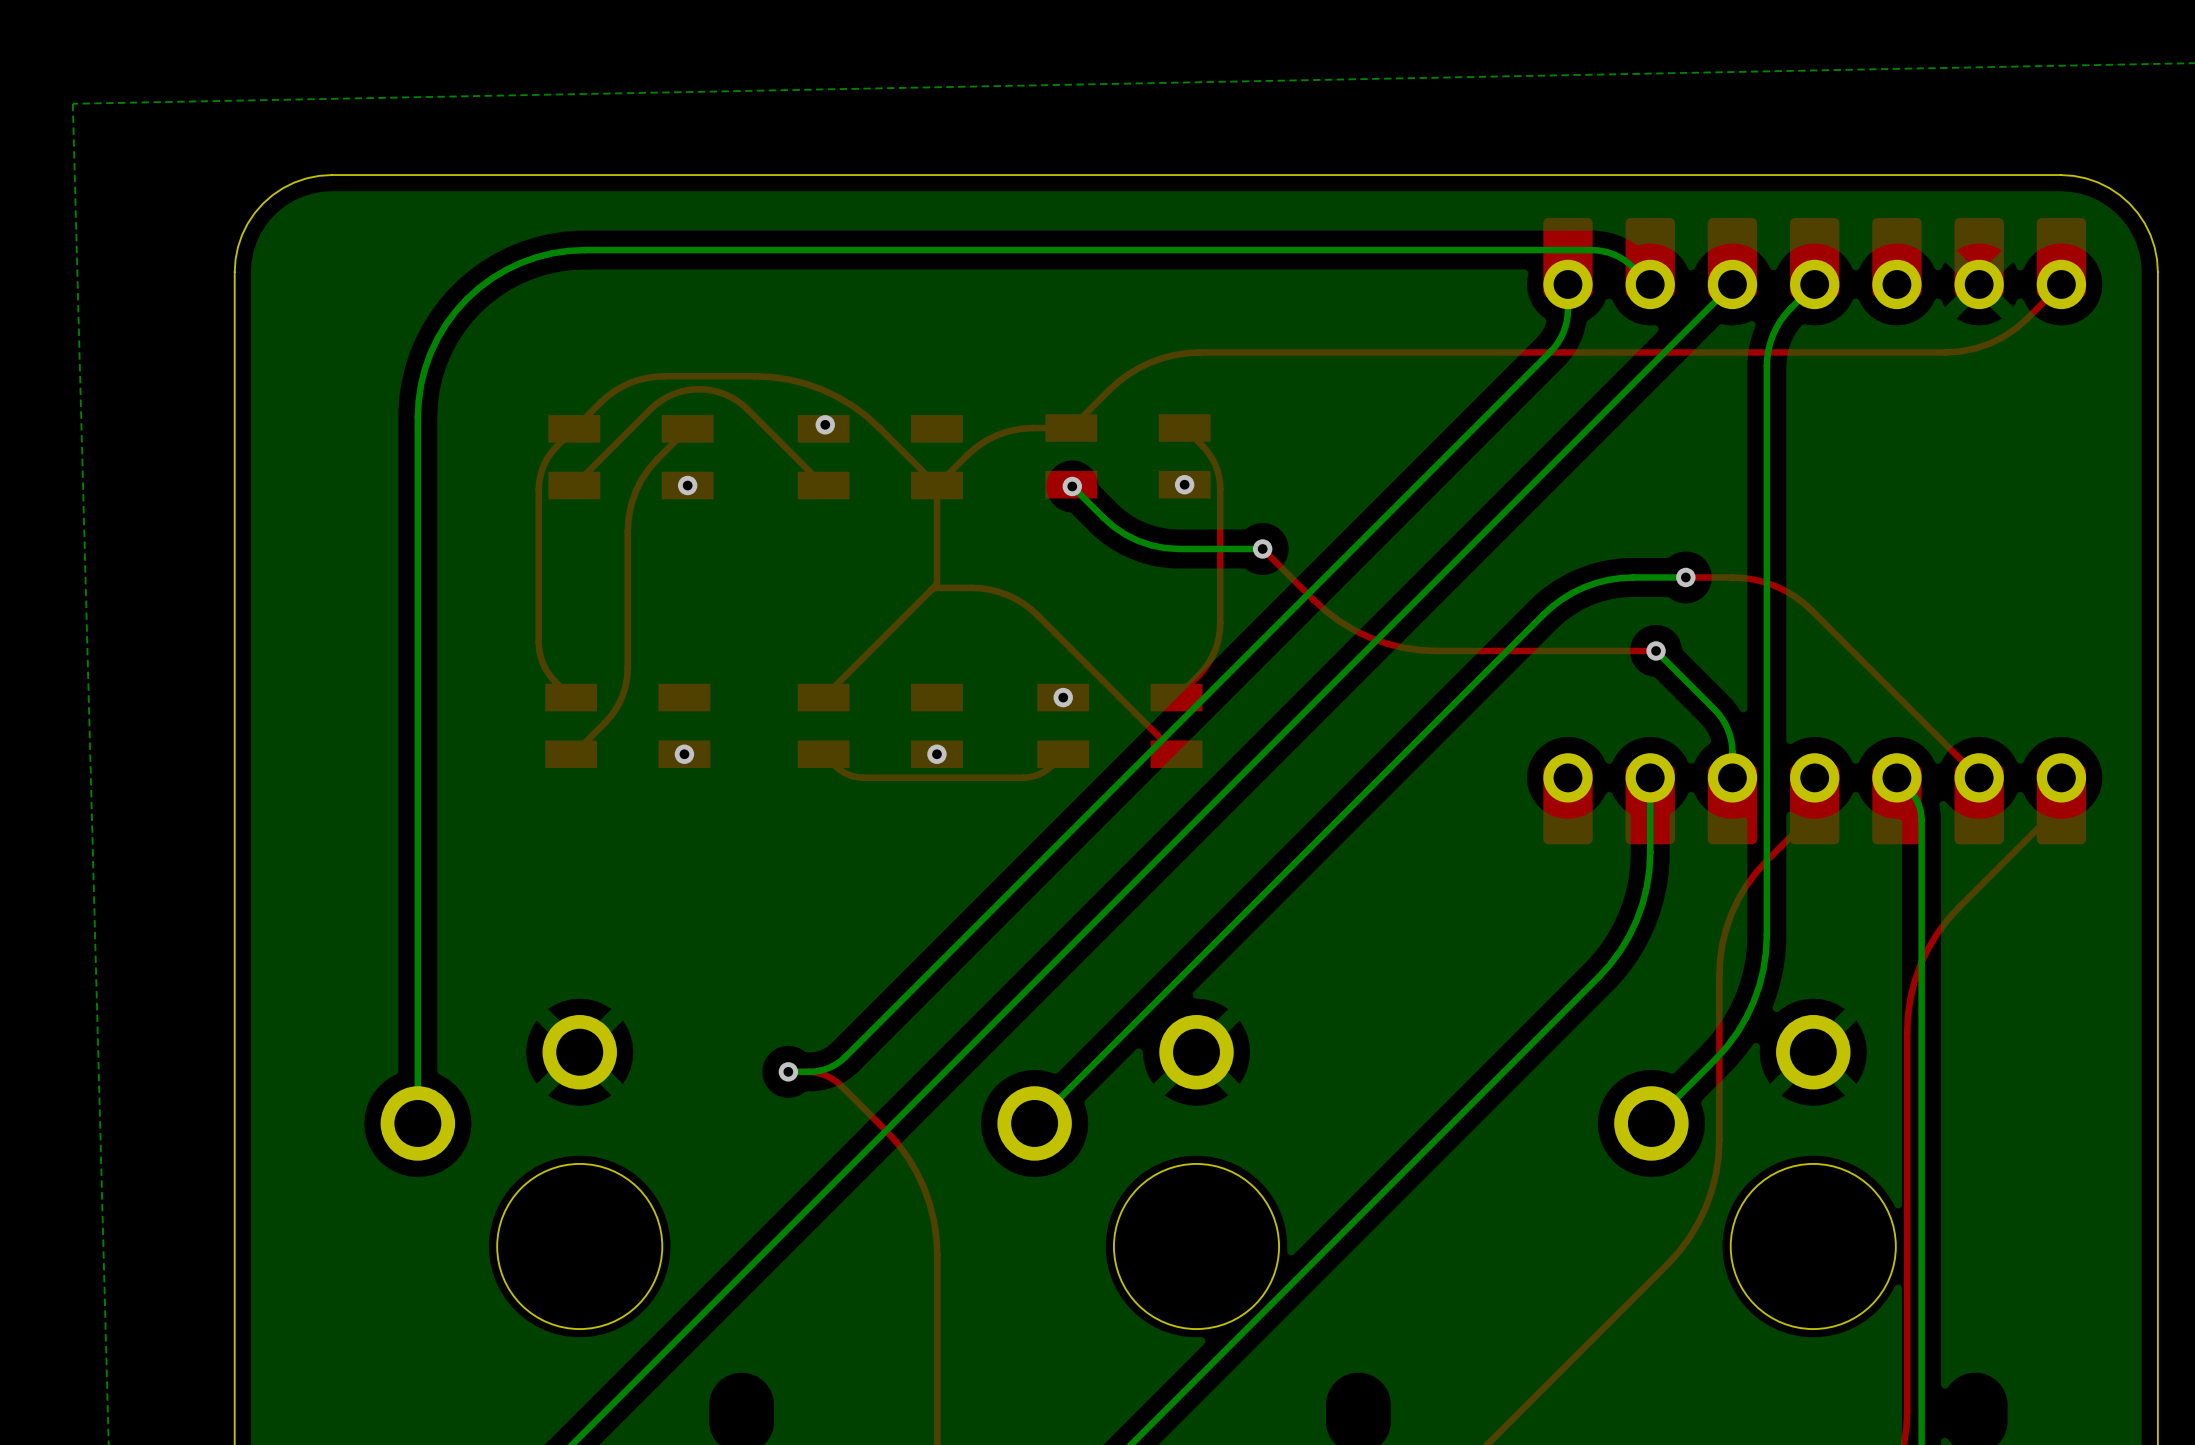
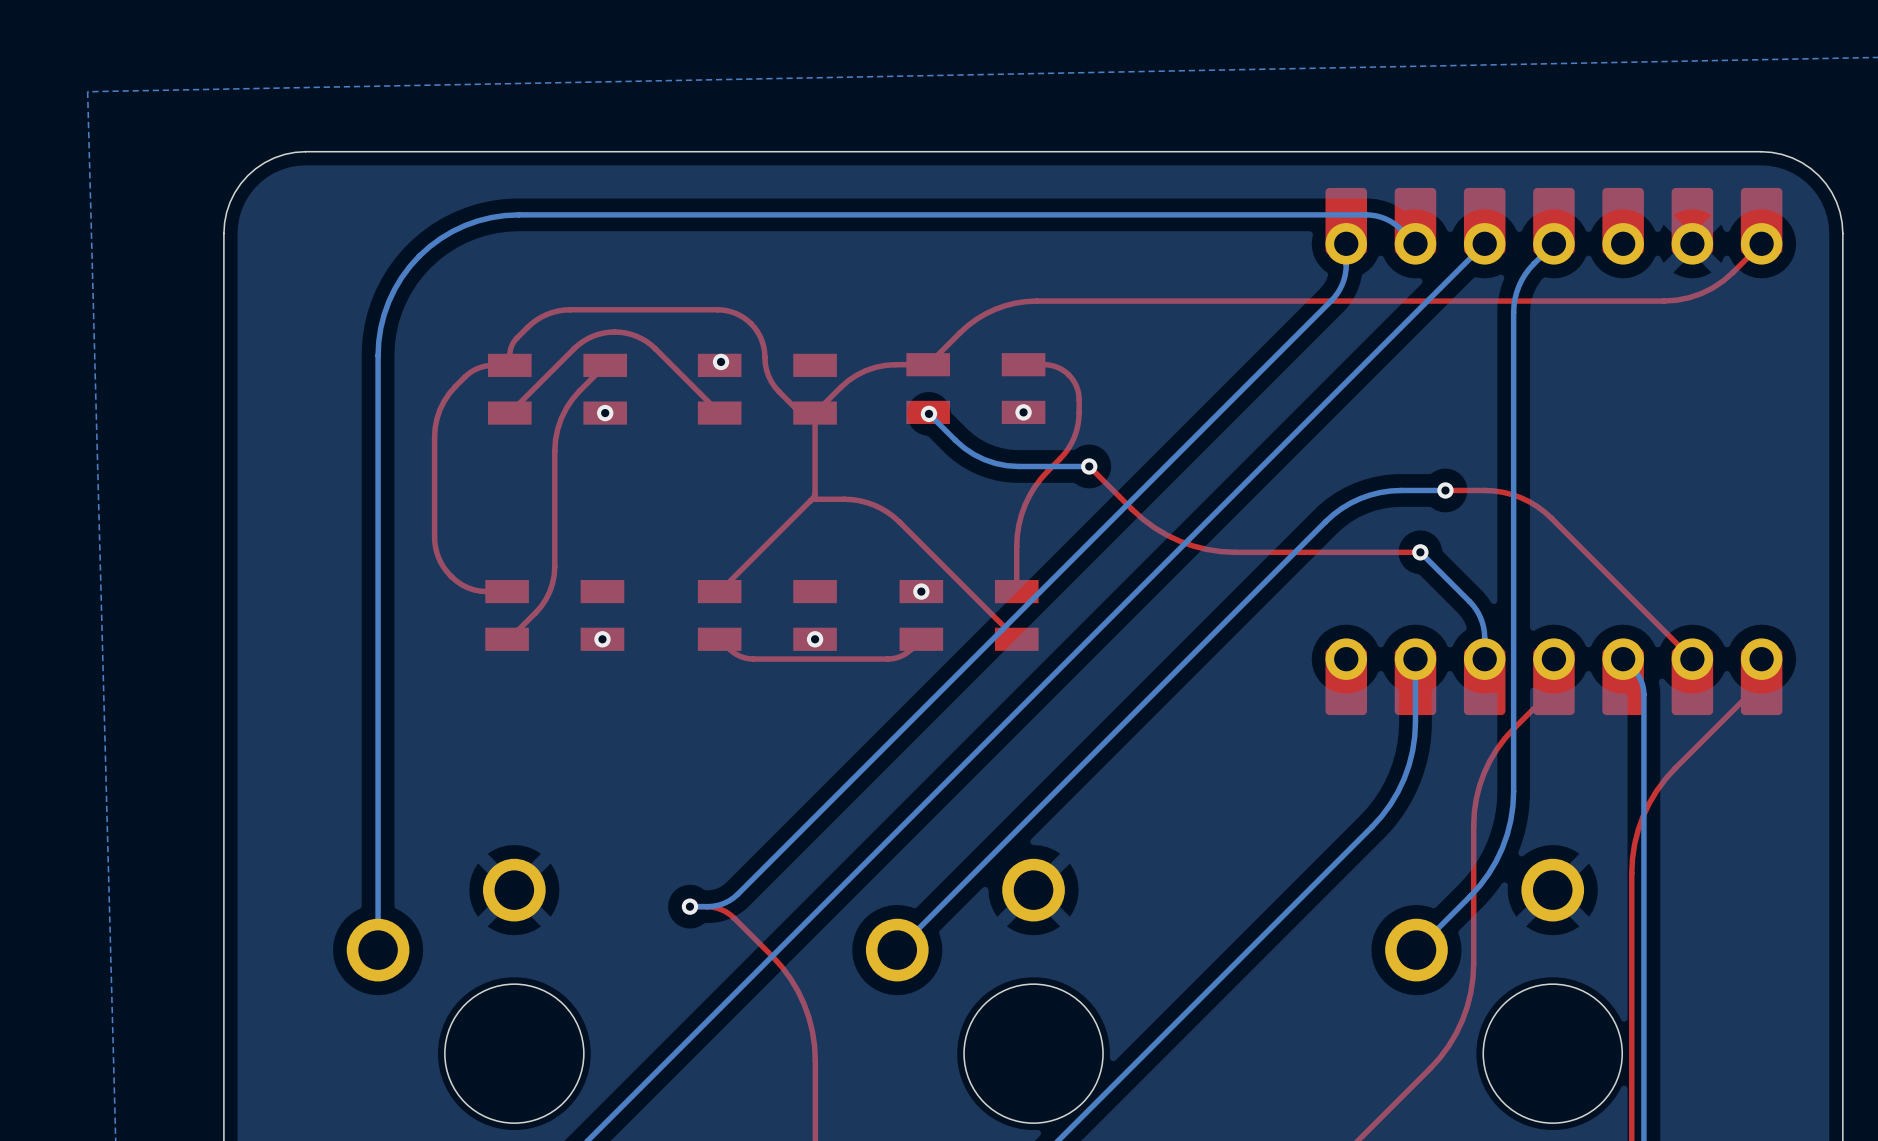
top track: none -> (764, 357) (766, 370) (774, 387) (802, 415) (811, 413)
top track: (1184, 428) (1210, 455) (1219, 476) (1220, 622) (1217, 644) (1211, 658) (1203, 670) (1176, 697) -> (1023, 364) (1050, 365) (1066, 372) (1073, 380) (1077, 389) (1079, 412) (1077, 425) (1071, 443) (1034, 487) (1021, 515) (1017, 535) (1016, 591)
top track: (936, 485) (866, 416) (837, 397) (805, 383) (771, 377) (664, 376) (638, 380) (621, 386) (600, 402) (551, 452) (543, 466) (539, 481) (539, 649) (546, 669) (571, 697) -> (764, 357) (761, 339) (754, 327) (739, 315) (726, 310) (564, 310) (541, 316) (527, 327) (513, 343) (506, 363) (481, 367) (464, 377) (444, 401) (435, 427) (435, 547) (443, 567) (462, 585) (480, 591) (507, 591)

